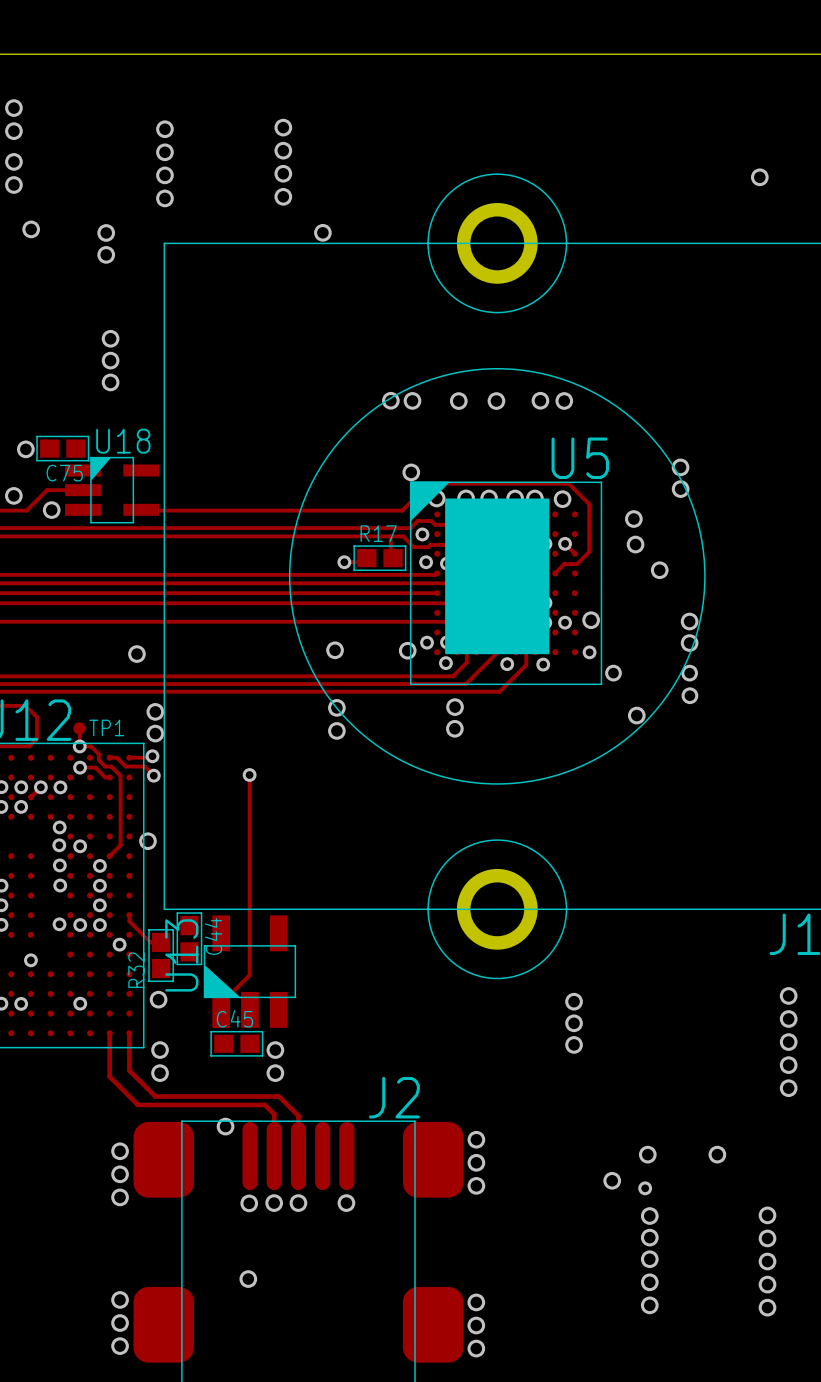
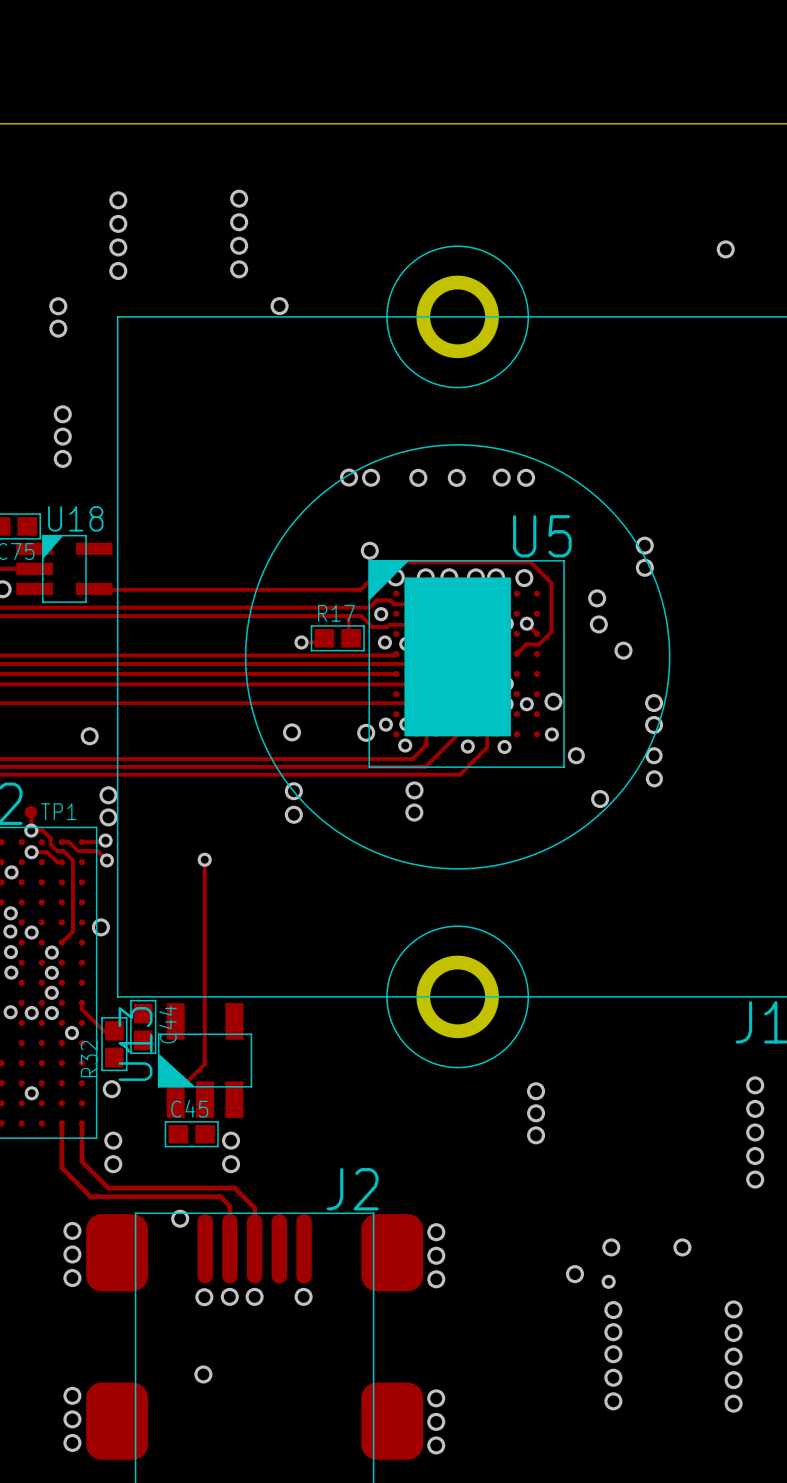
via: none -> (72, 1230)
via: (120, 1151) -> none
via: none -> (72, 1254)
via: (120, 1174) -> none
via: none -> (72, 1278)
via: (120, 1197) -> none

